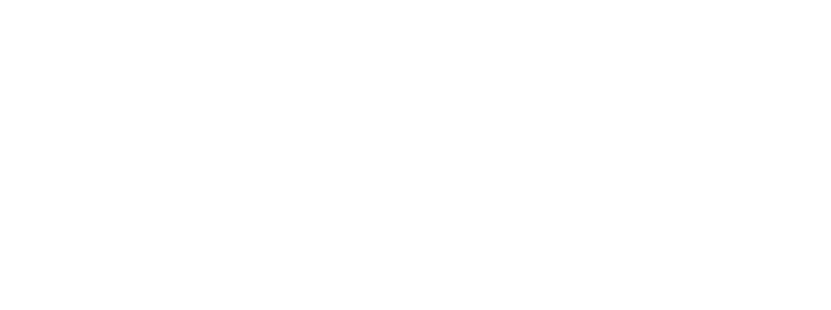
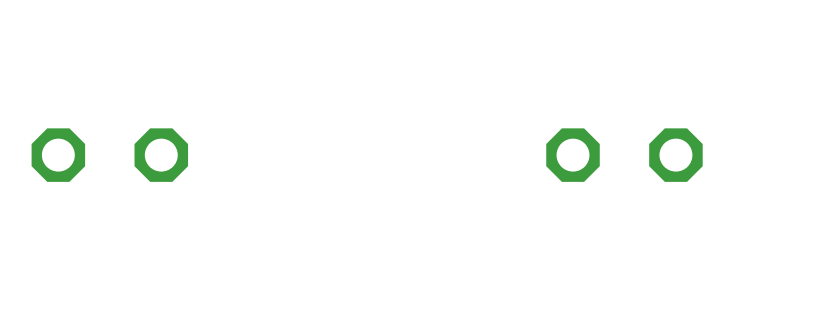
part: none -> (109, 155)
part: none -> (624, 155)

